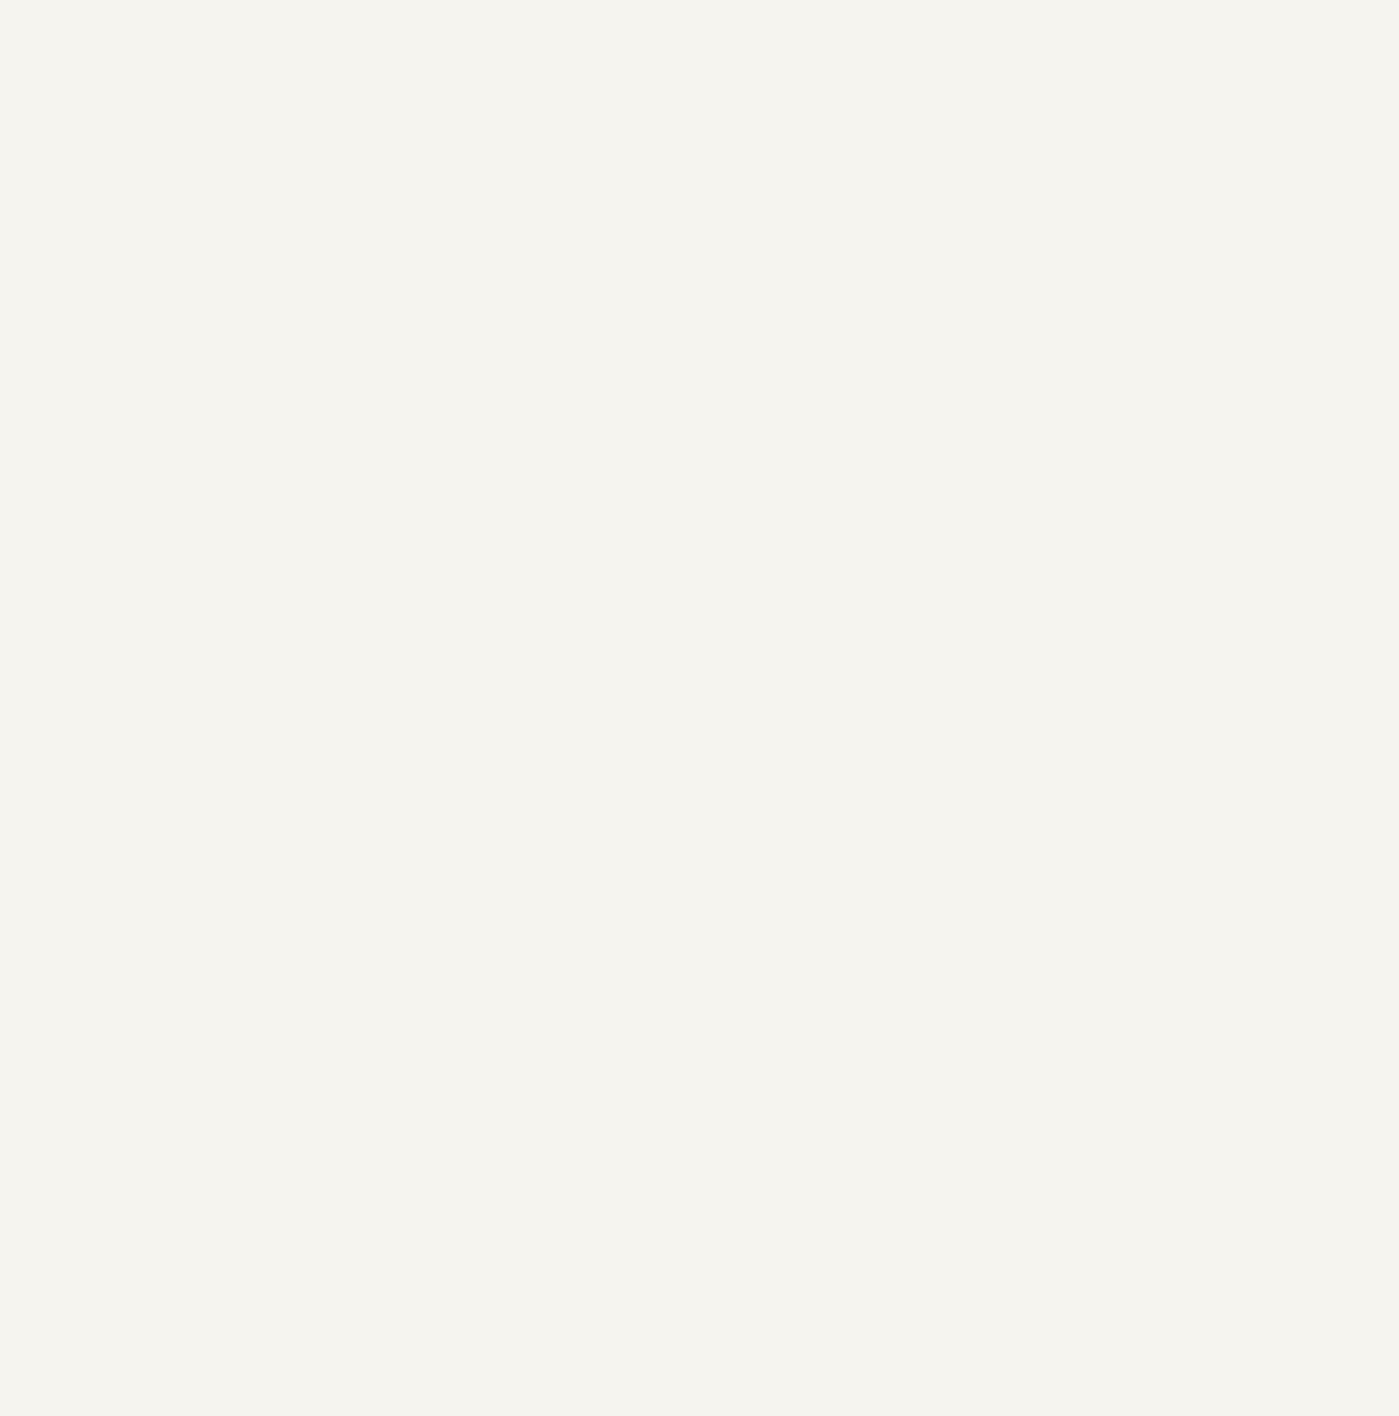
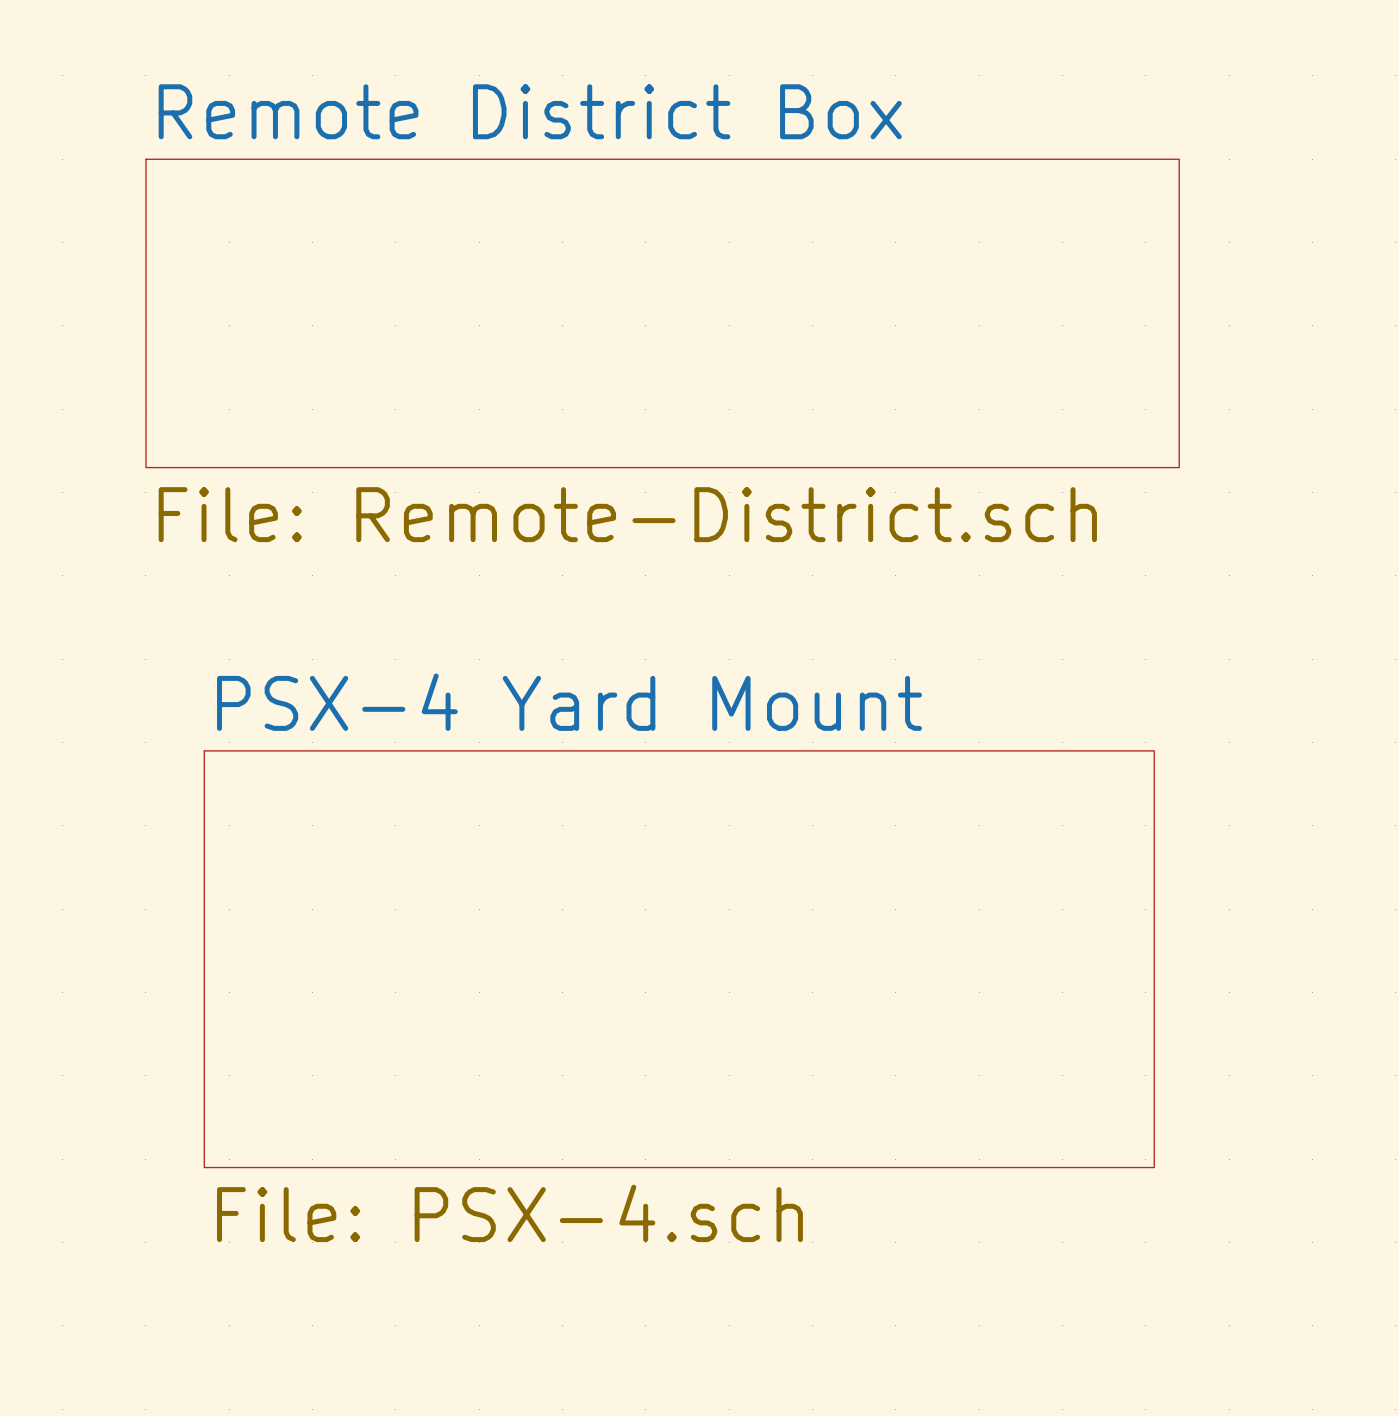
sheet Remote District Box: none -> File: Remote-District.sch (662, 313)
sheet PSX-4 Yard Mount: none -> File: PSX-4.sch (679, 959)

